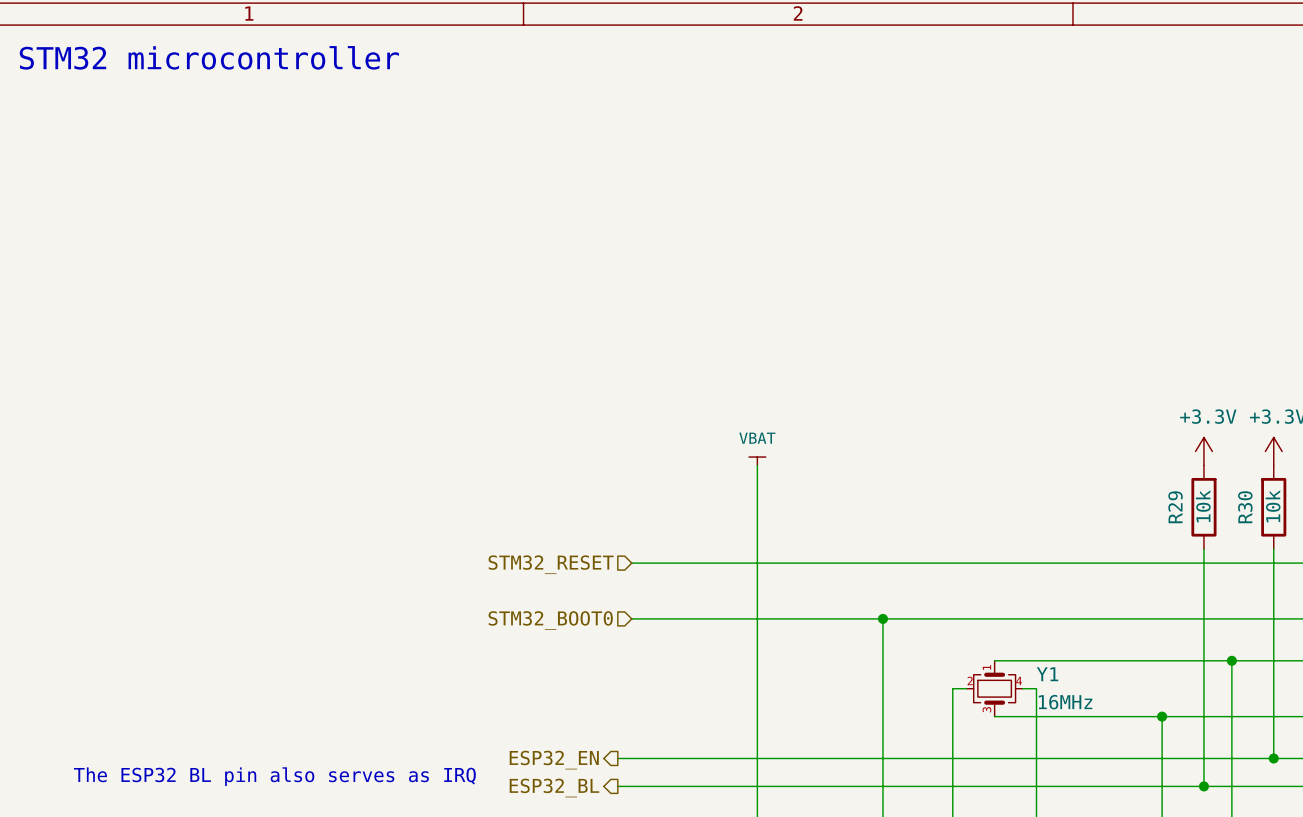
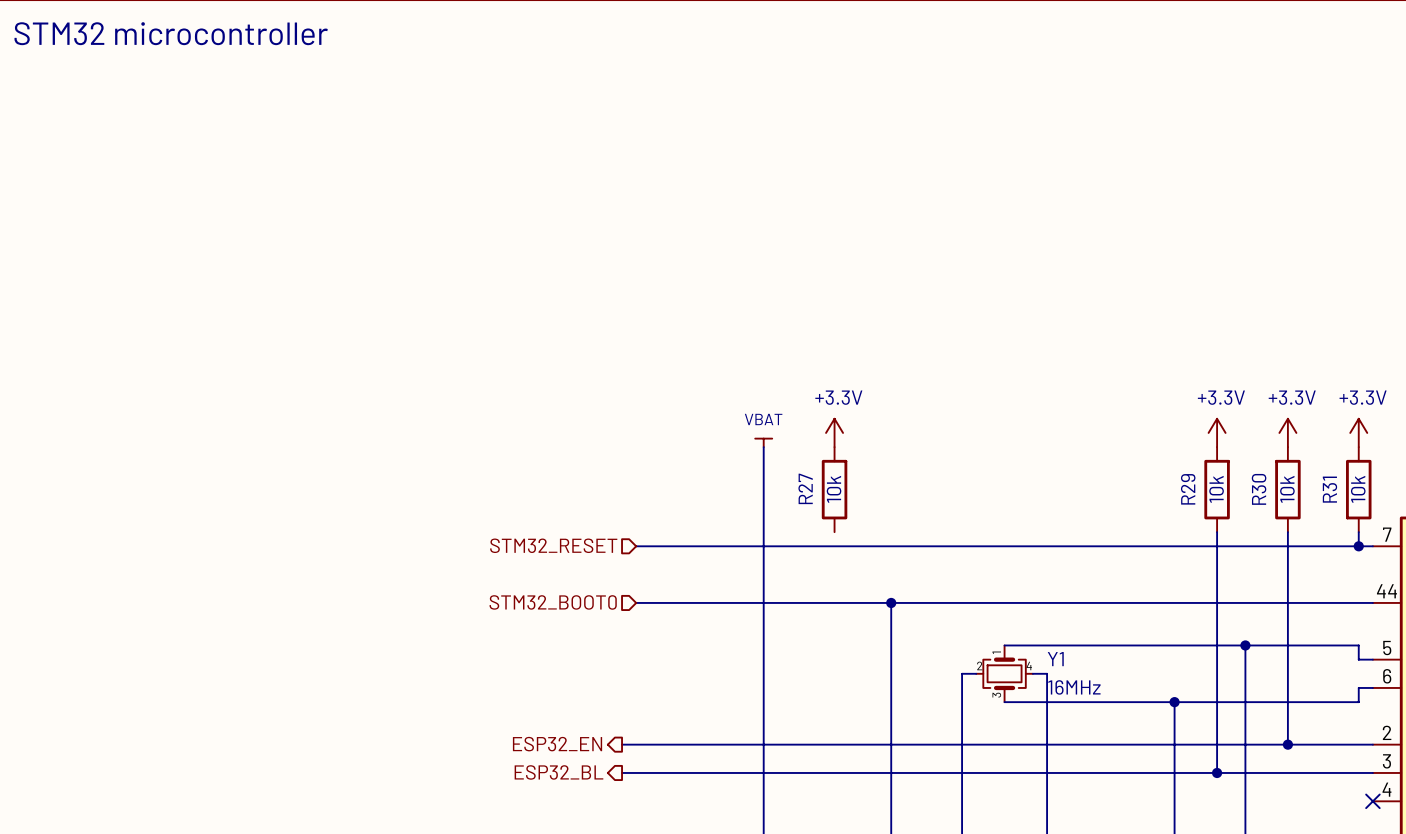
power symbol: none -> +3.3V (834, 432)
R27: none -> 10k (834, 489)
text: The ESP32 BL pin also serves as IRQ (274, 776) -> none

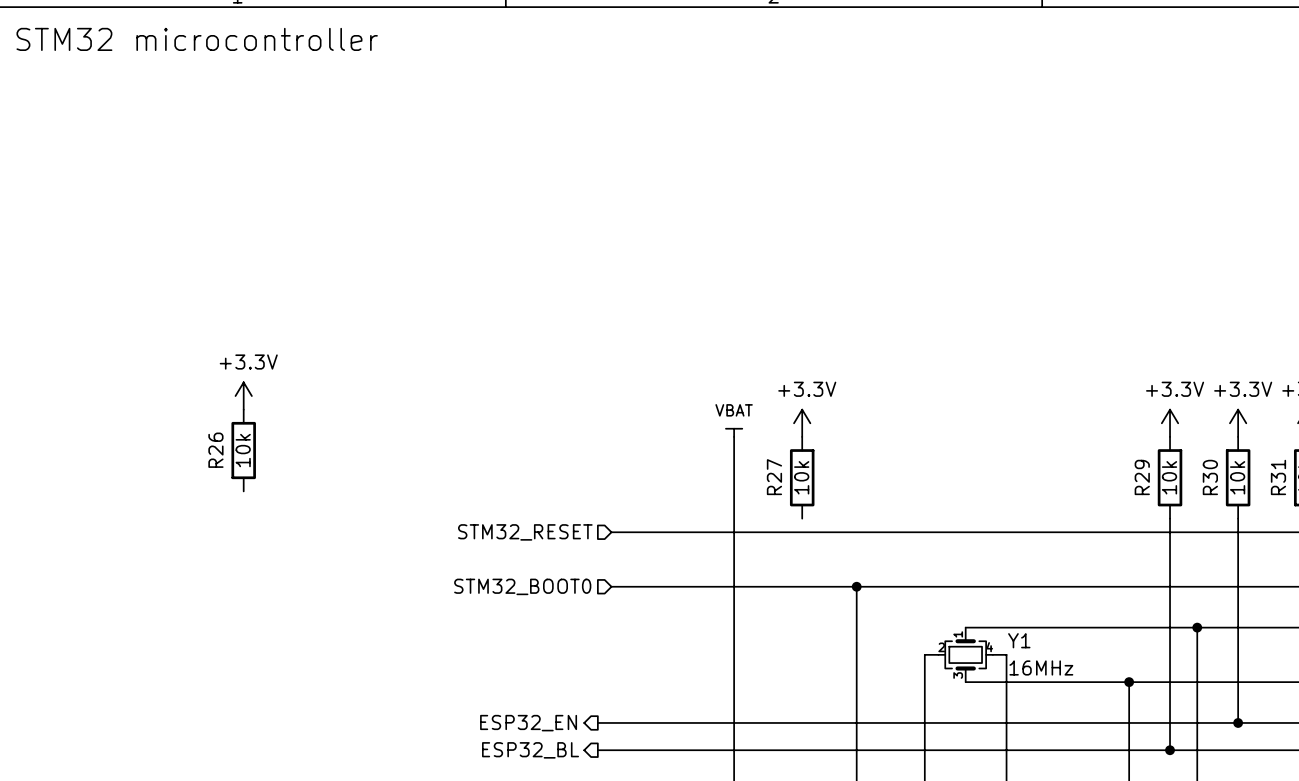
power symbol: none -> +3.3V (243, 396)
R26: none -> 10k (243, 450)

